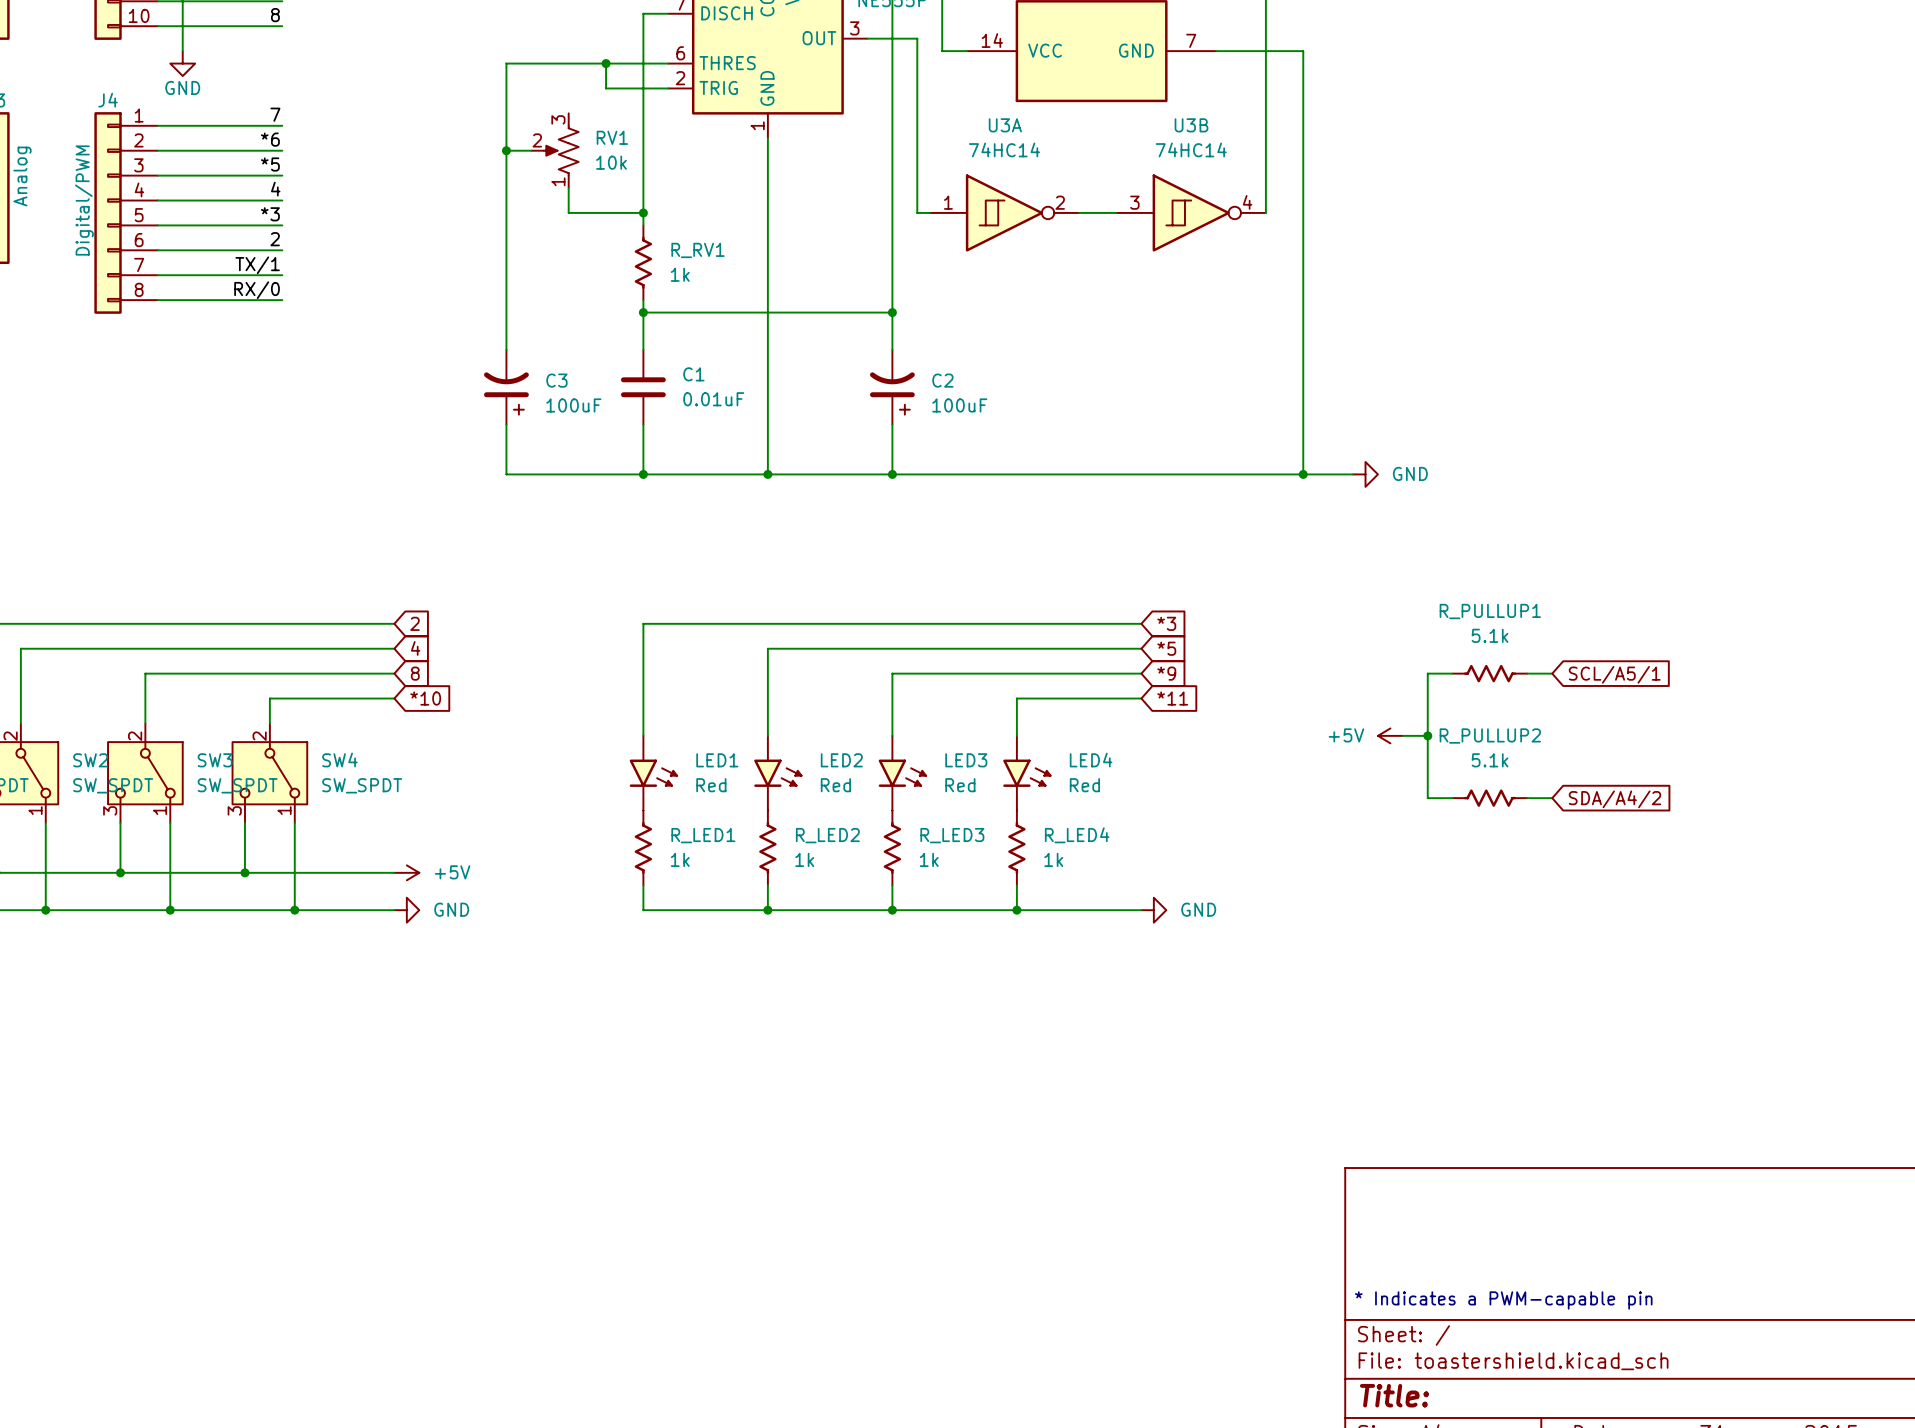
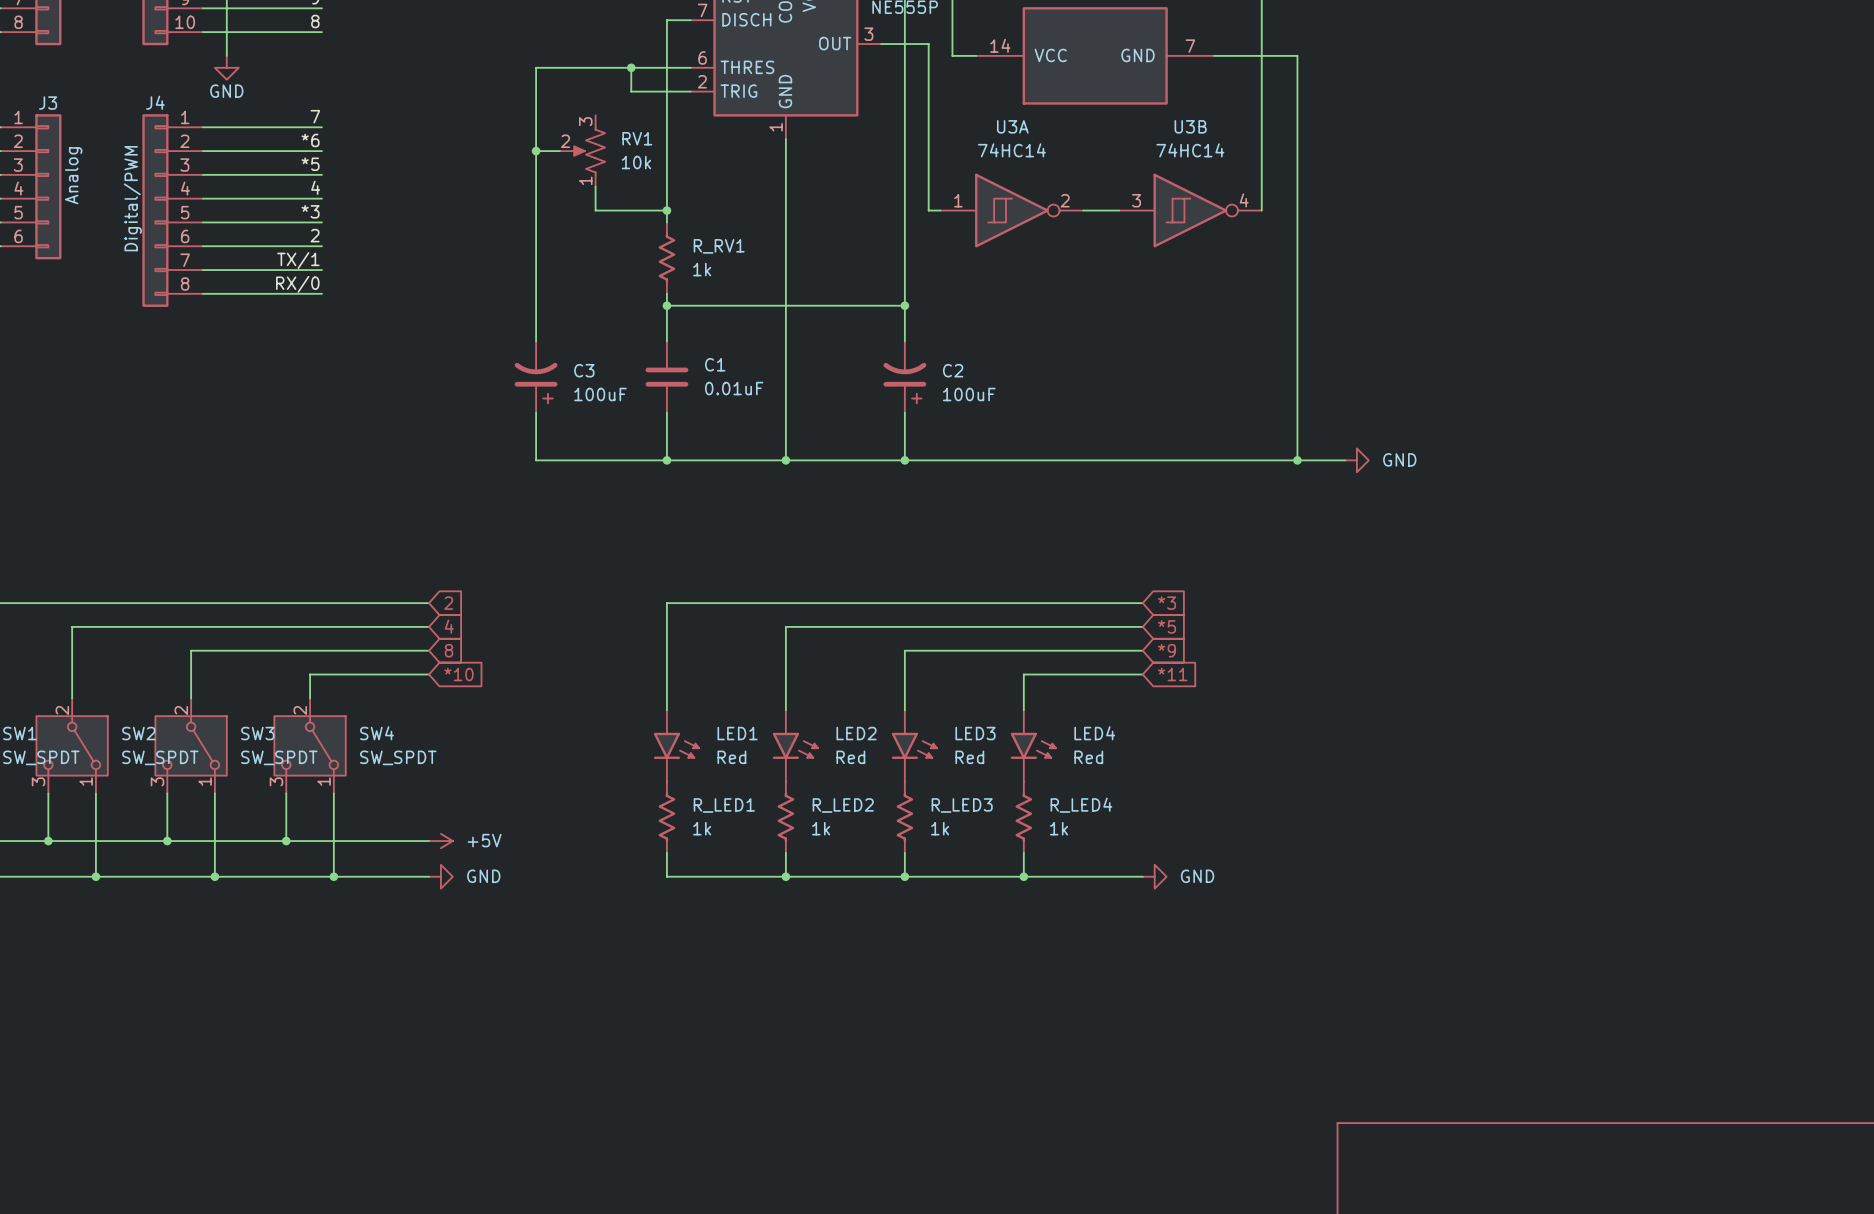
wire: (1452, 673) (1427, 673) (1427, 798) (1452, 798) -> none
R_PULLUP1: 5.1k (1490, 673) -> none
wire: (1527, 673) (1552, 673) -> none
global label: SCL/A5/1 (1614, 674) -> none
power symbol: +5V (1390, 735) -> none
wire: (1402, 735) (1427, 735) -> none
junction: (1427, 735) -> none
R_PULLUP2: 5.1k (1490, 798) -> none
wire: (1527, 798) (1552, 798) -> none
global label: SDA/A4/2 (1614, 799) -> none

